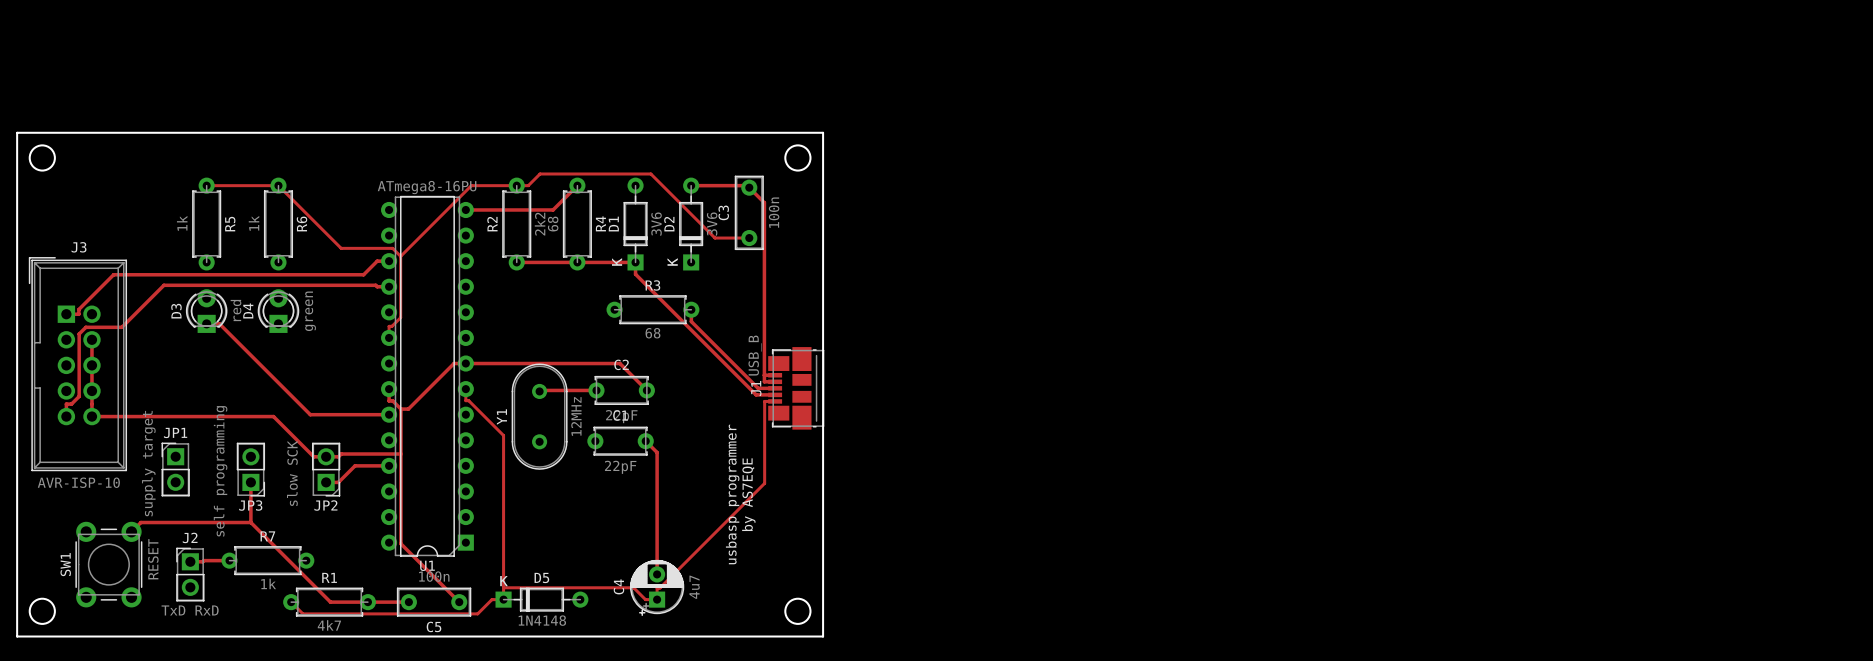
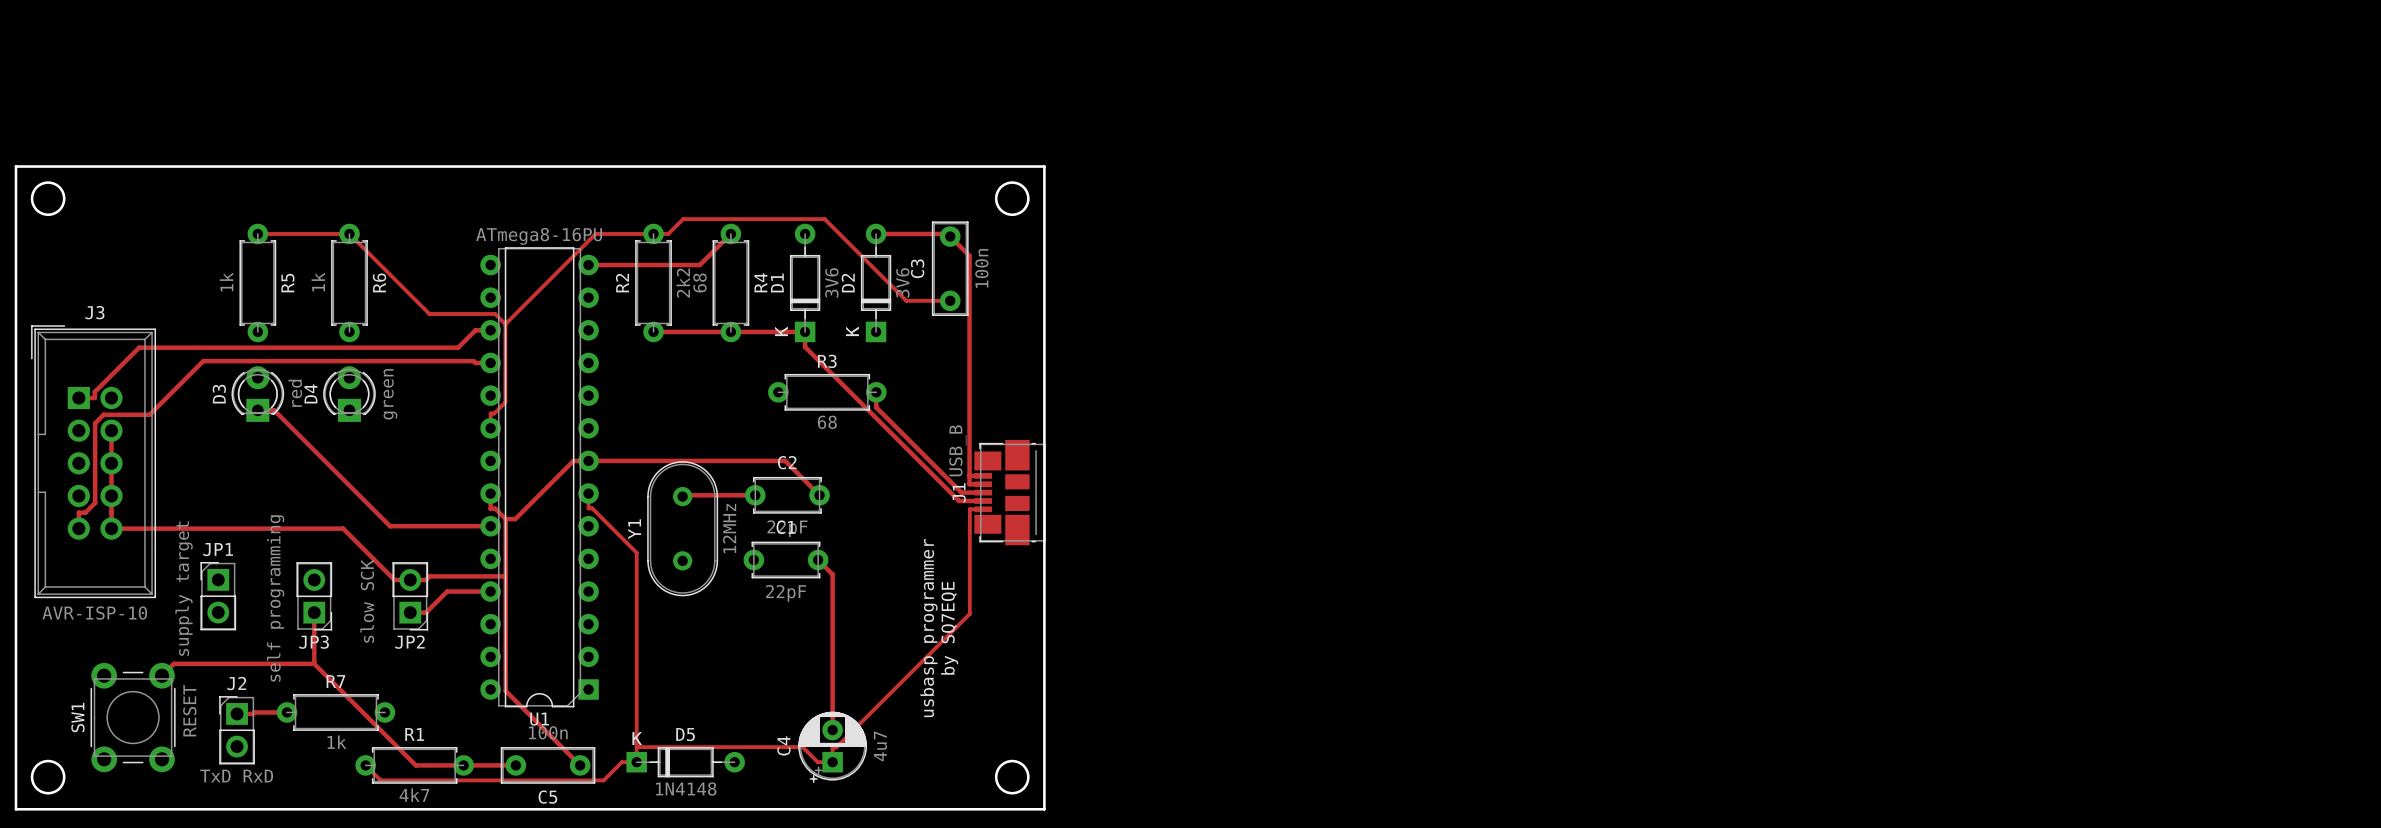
text: by AS7EQE (748, 494) -> by SQ7EQE (949, 628)

